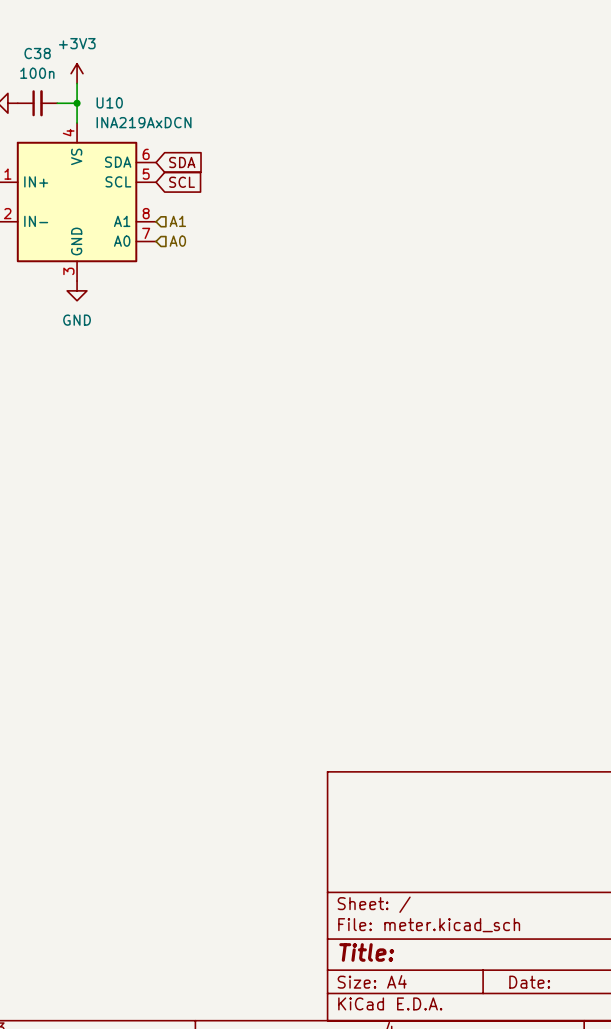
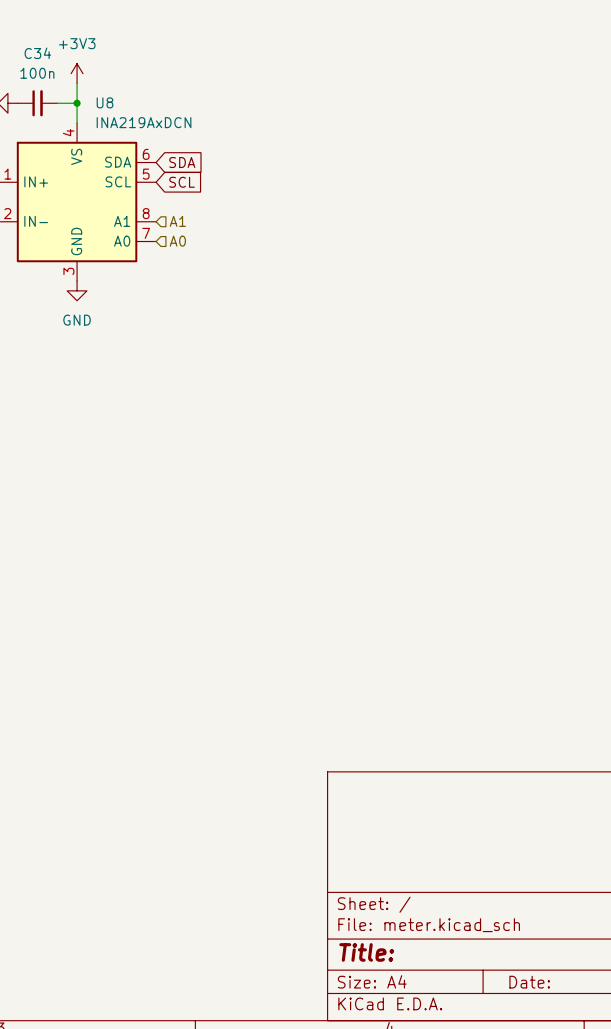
C38 name: C38 (37, 53) -> C34 (37, 53)
U10 name: U10 (109, 102) -> U8 (105, 102)

